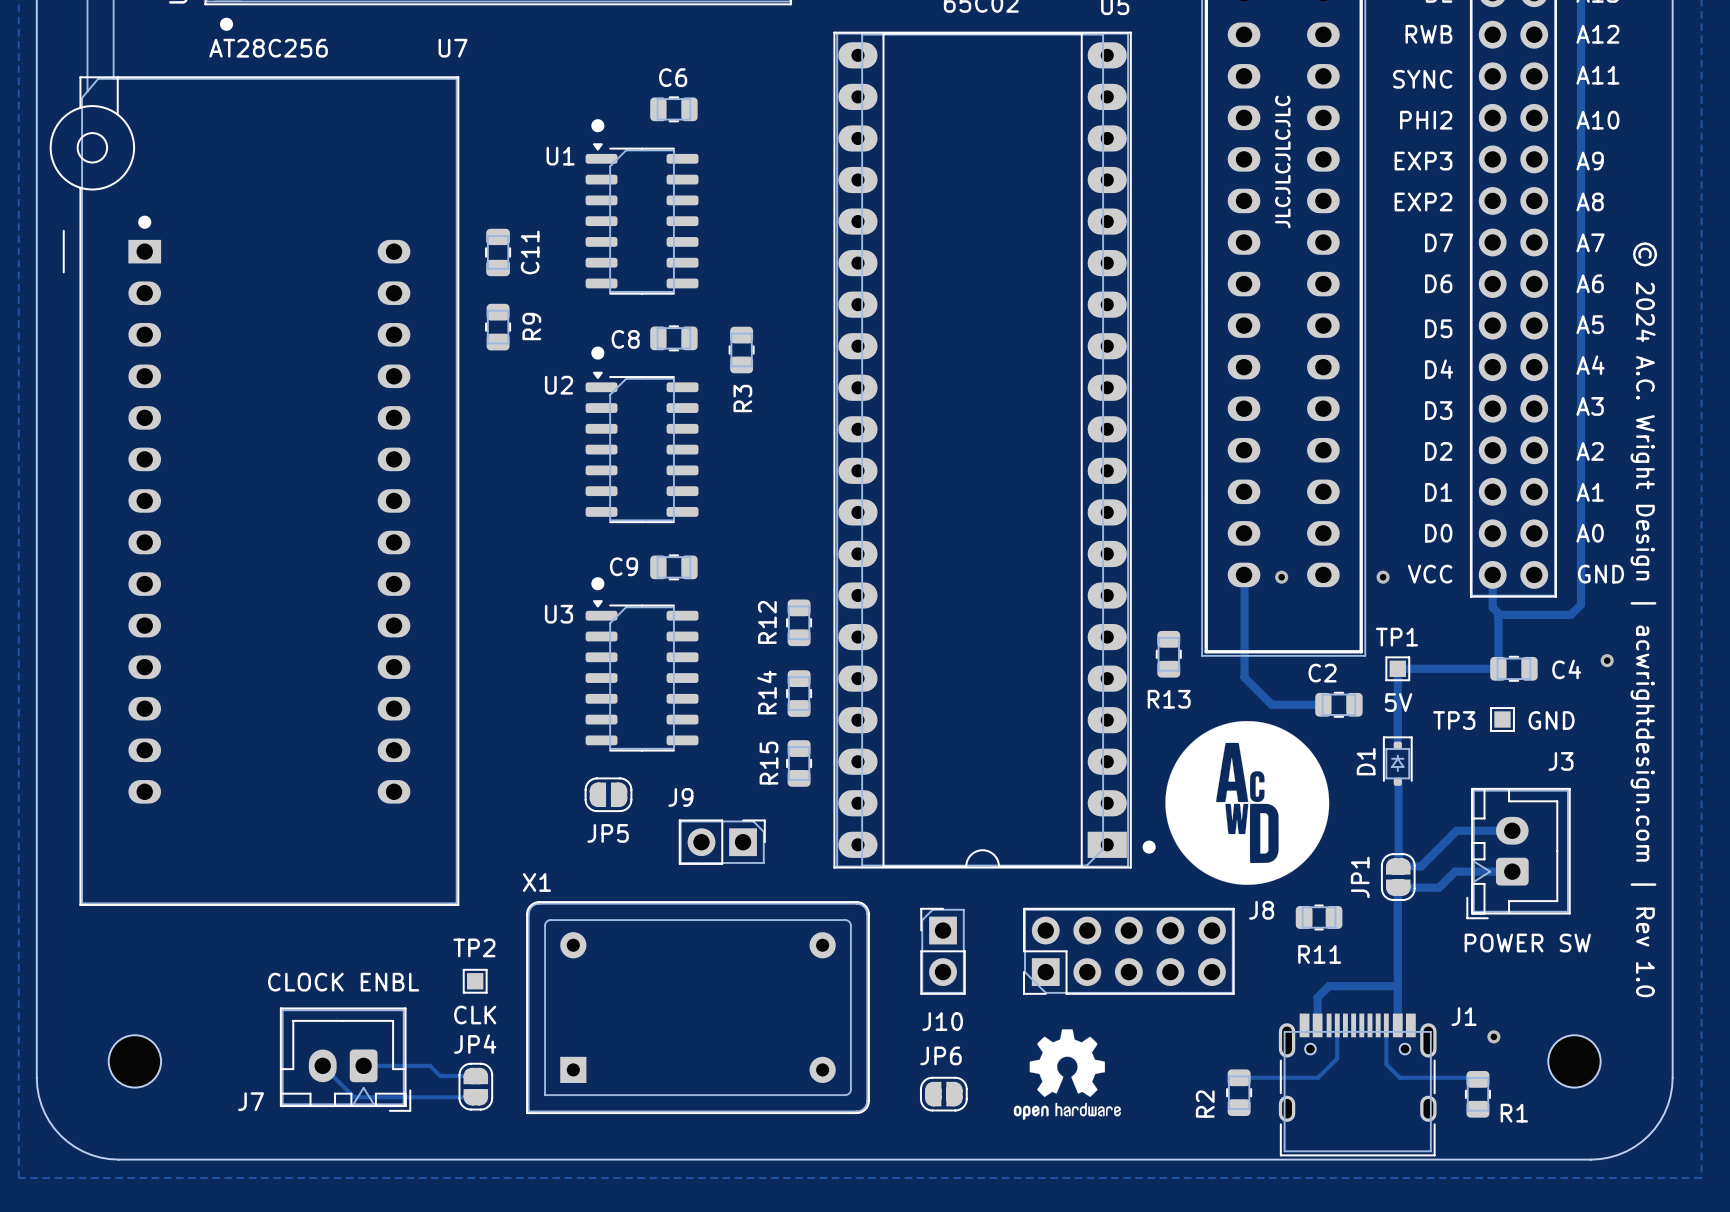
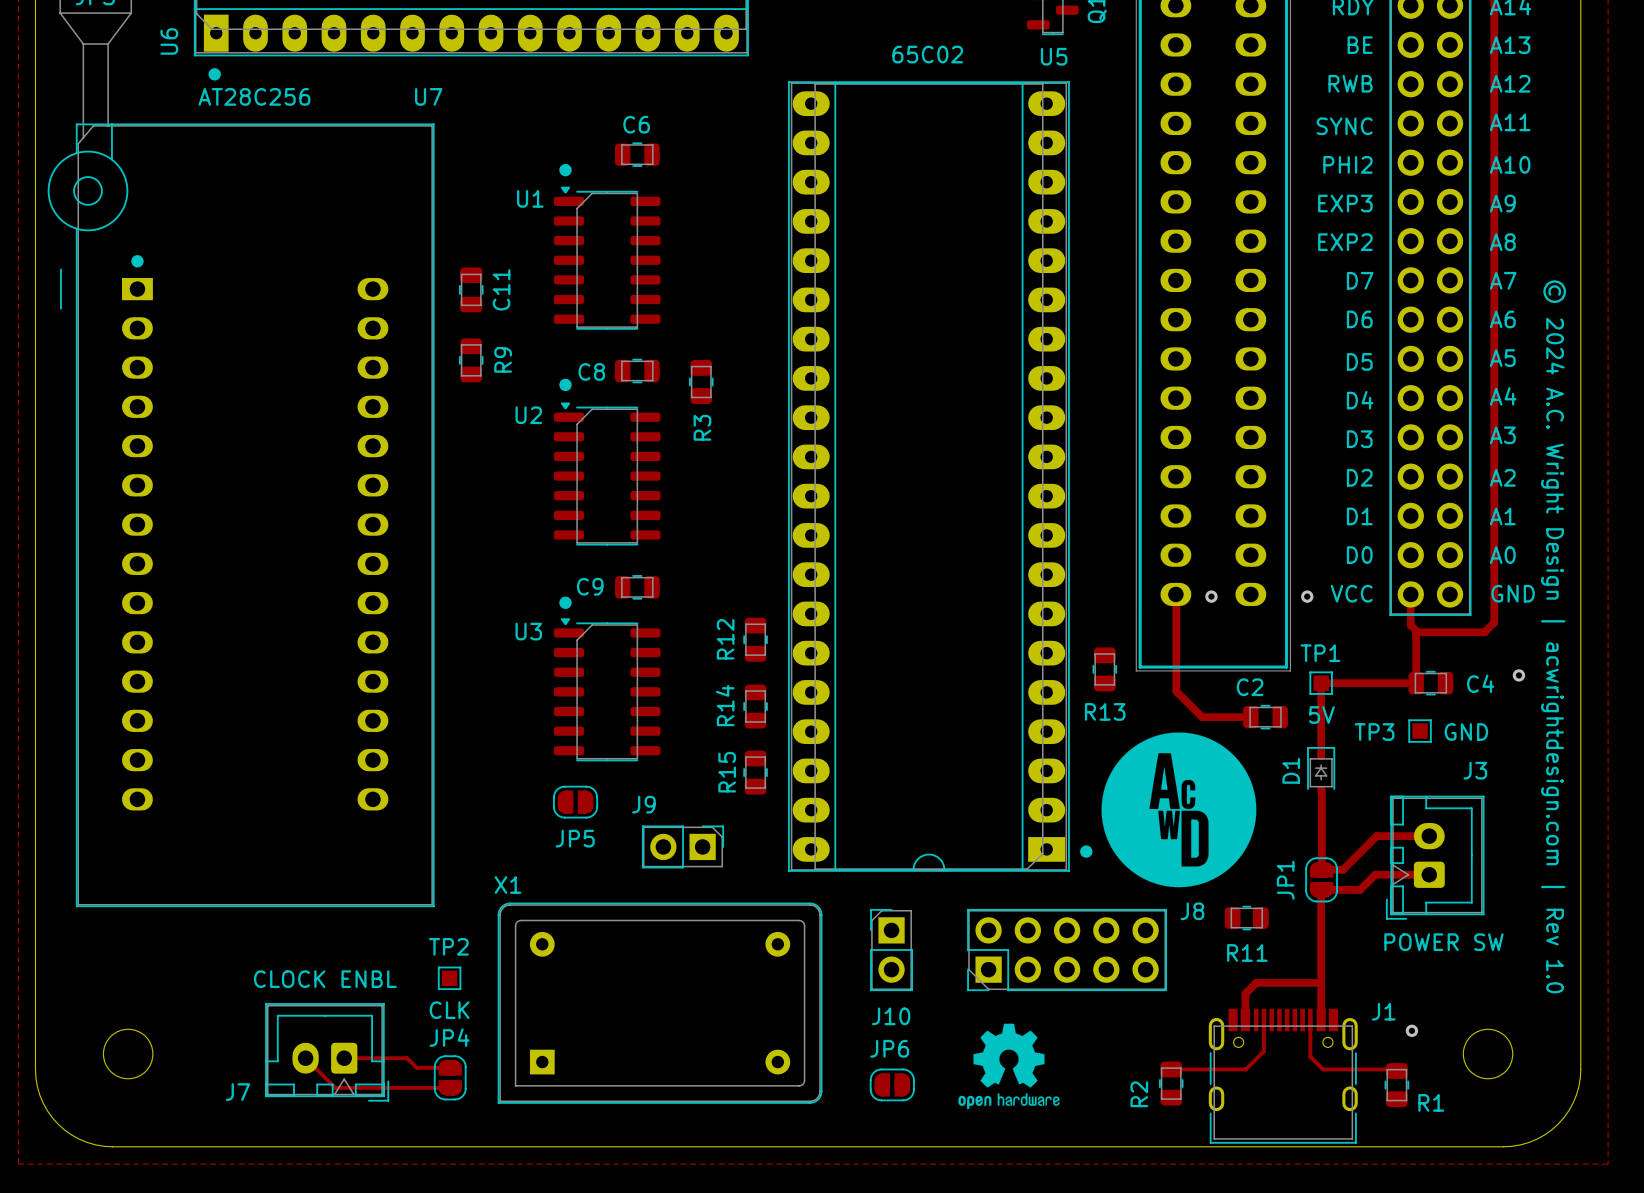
text: JLCJLCJLCJLC (1282, 162) -> none

